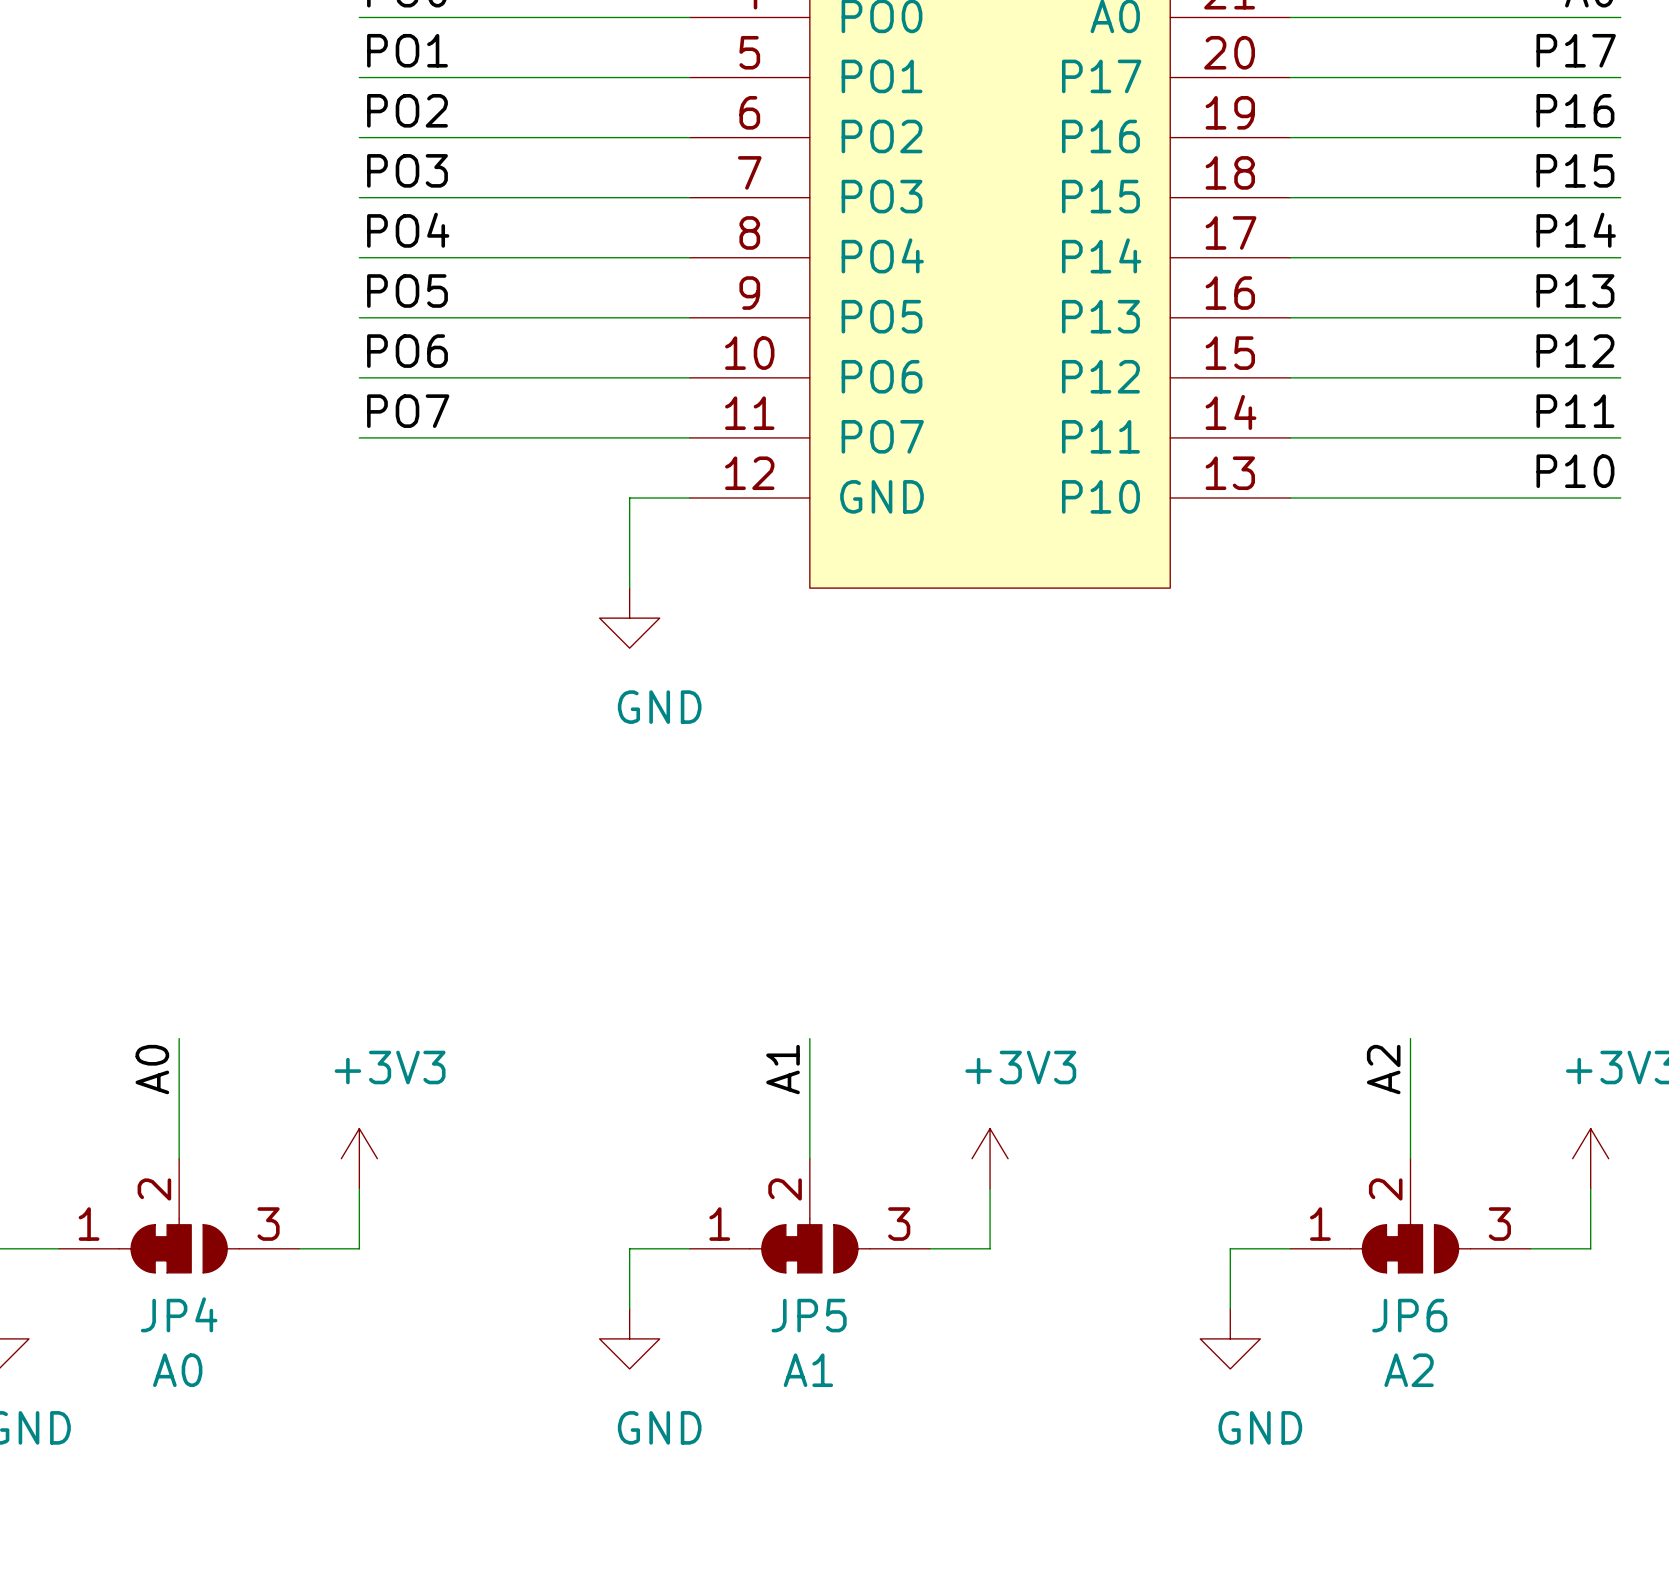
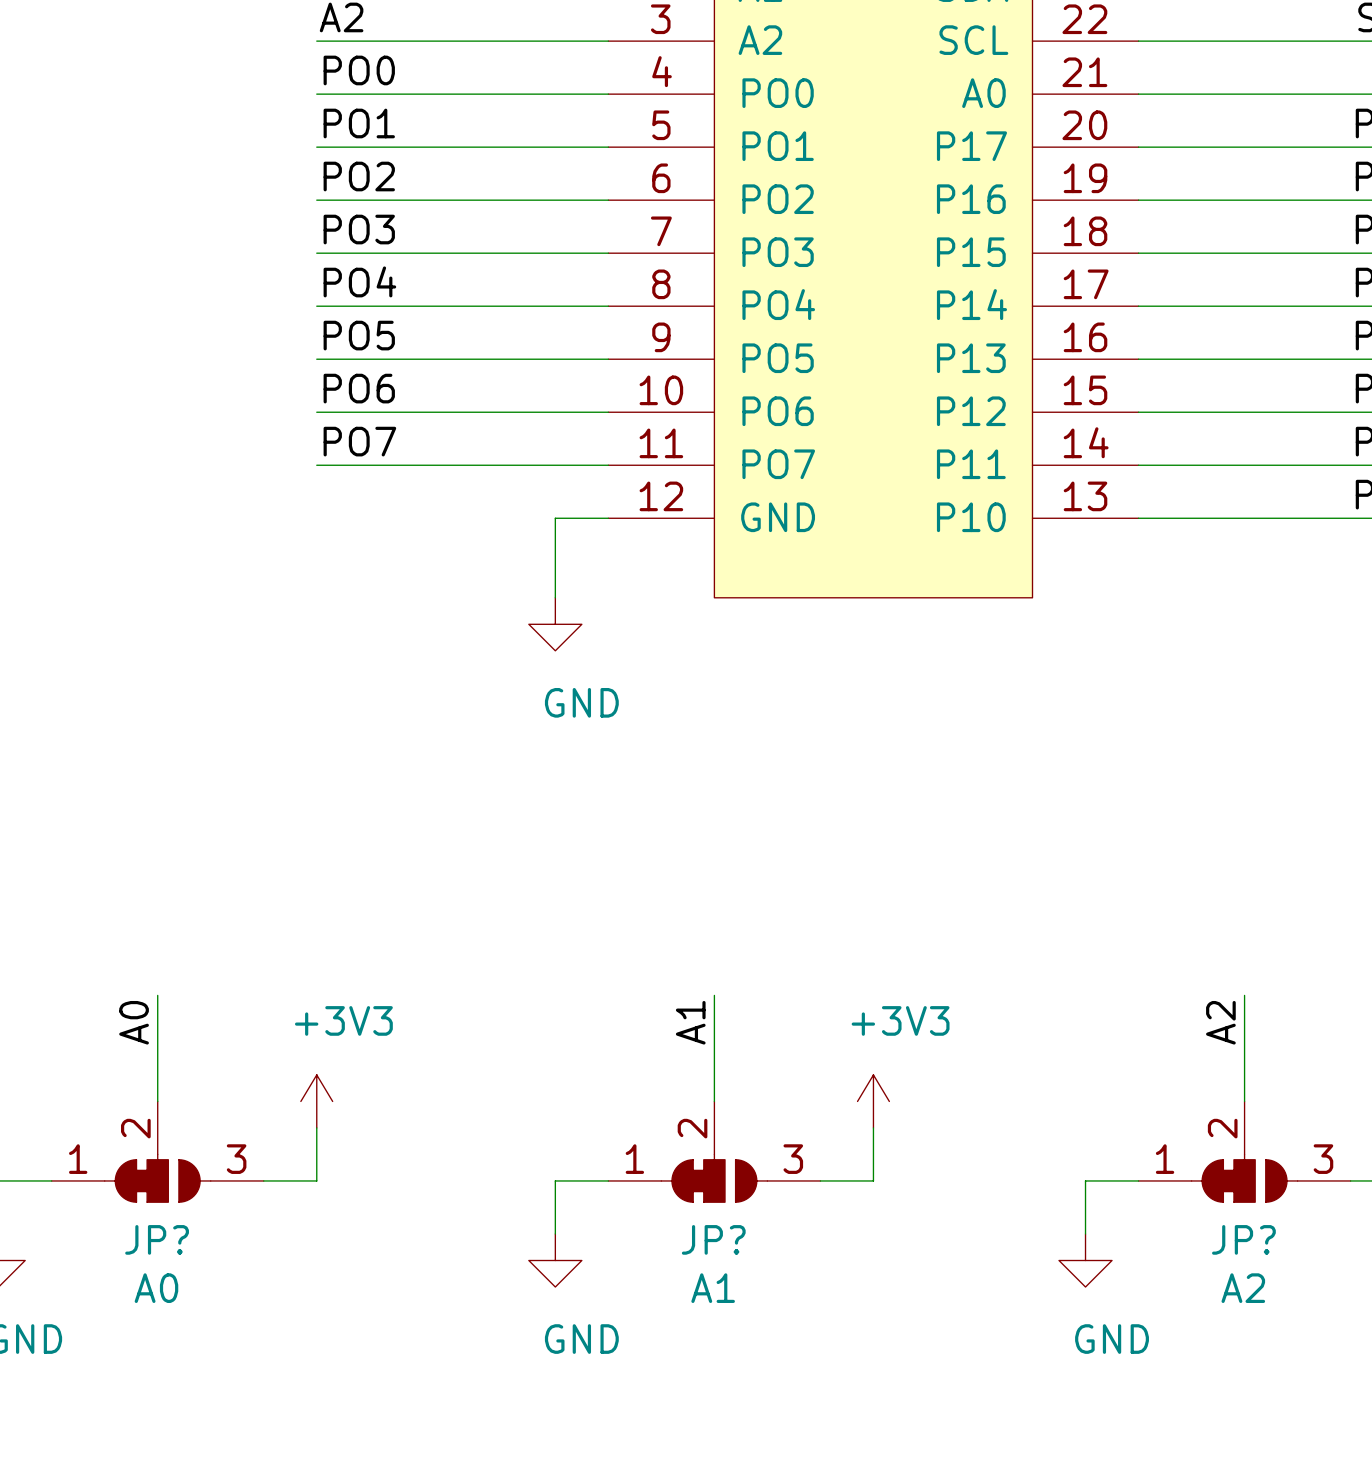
JP4 name: JP4 (179, 1314) -> JP? (157, 1239)
JP5 name: JP5 (809, 1315) -> JP? (713, 1239)
JP6 name: JP6 (1409, 1315) -> JP? (1243, 1239)

